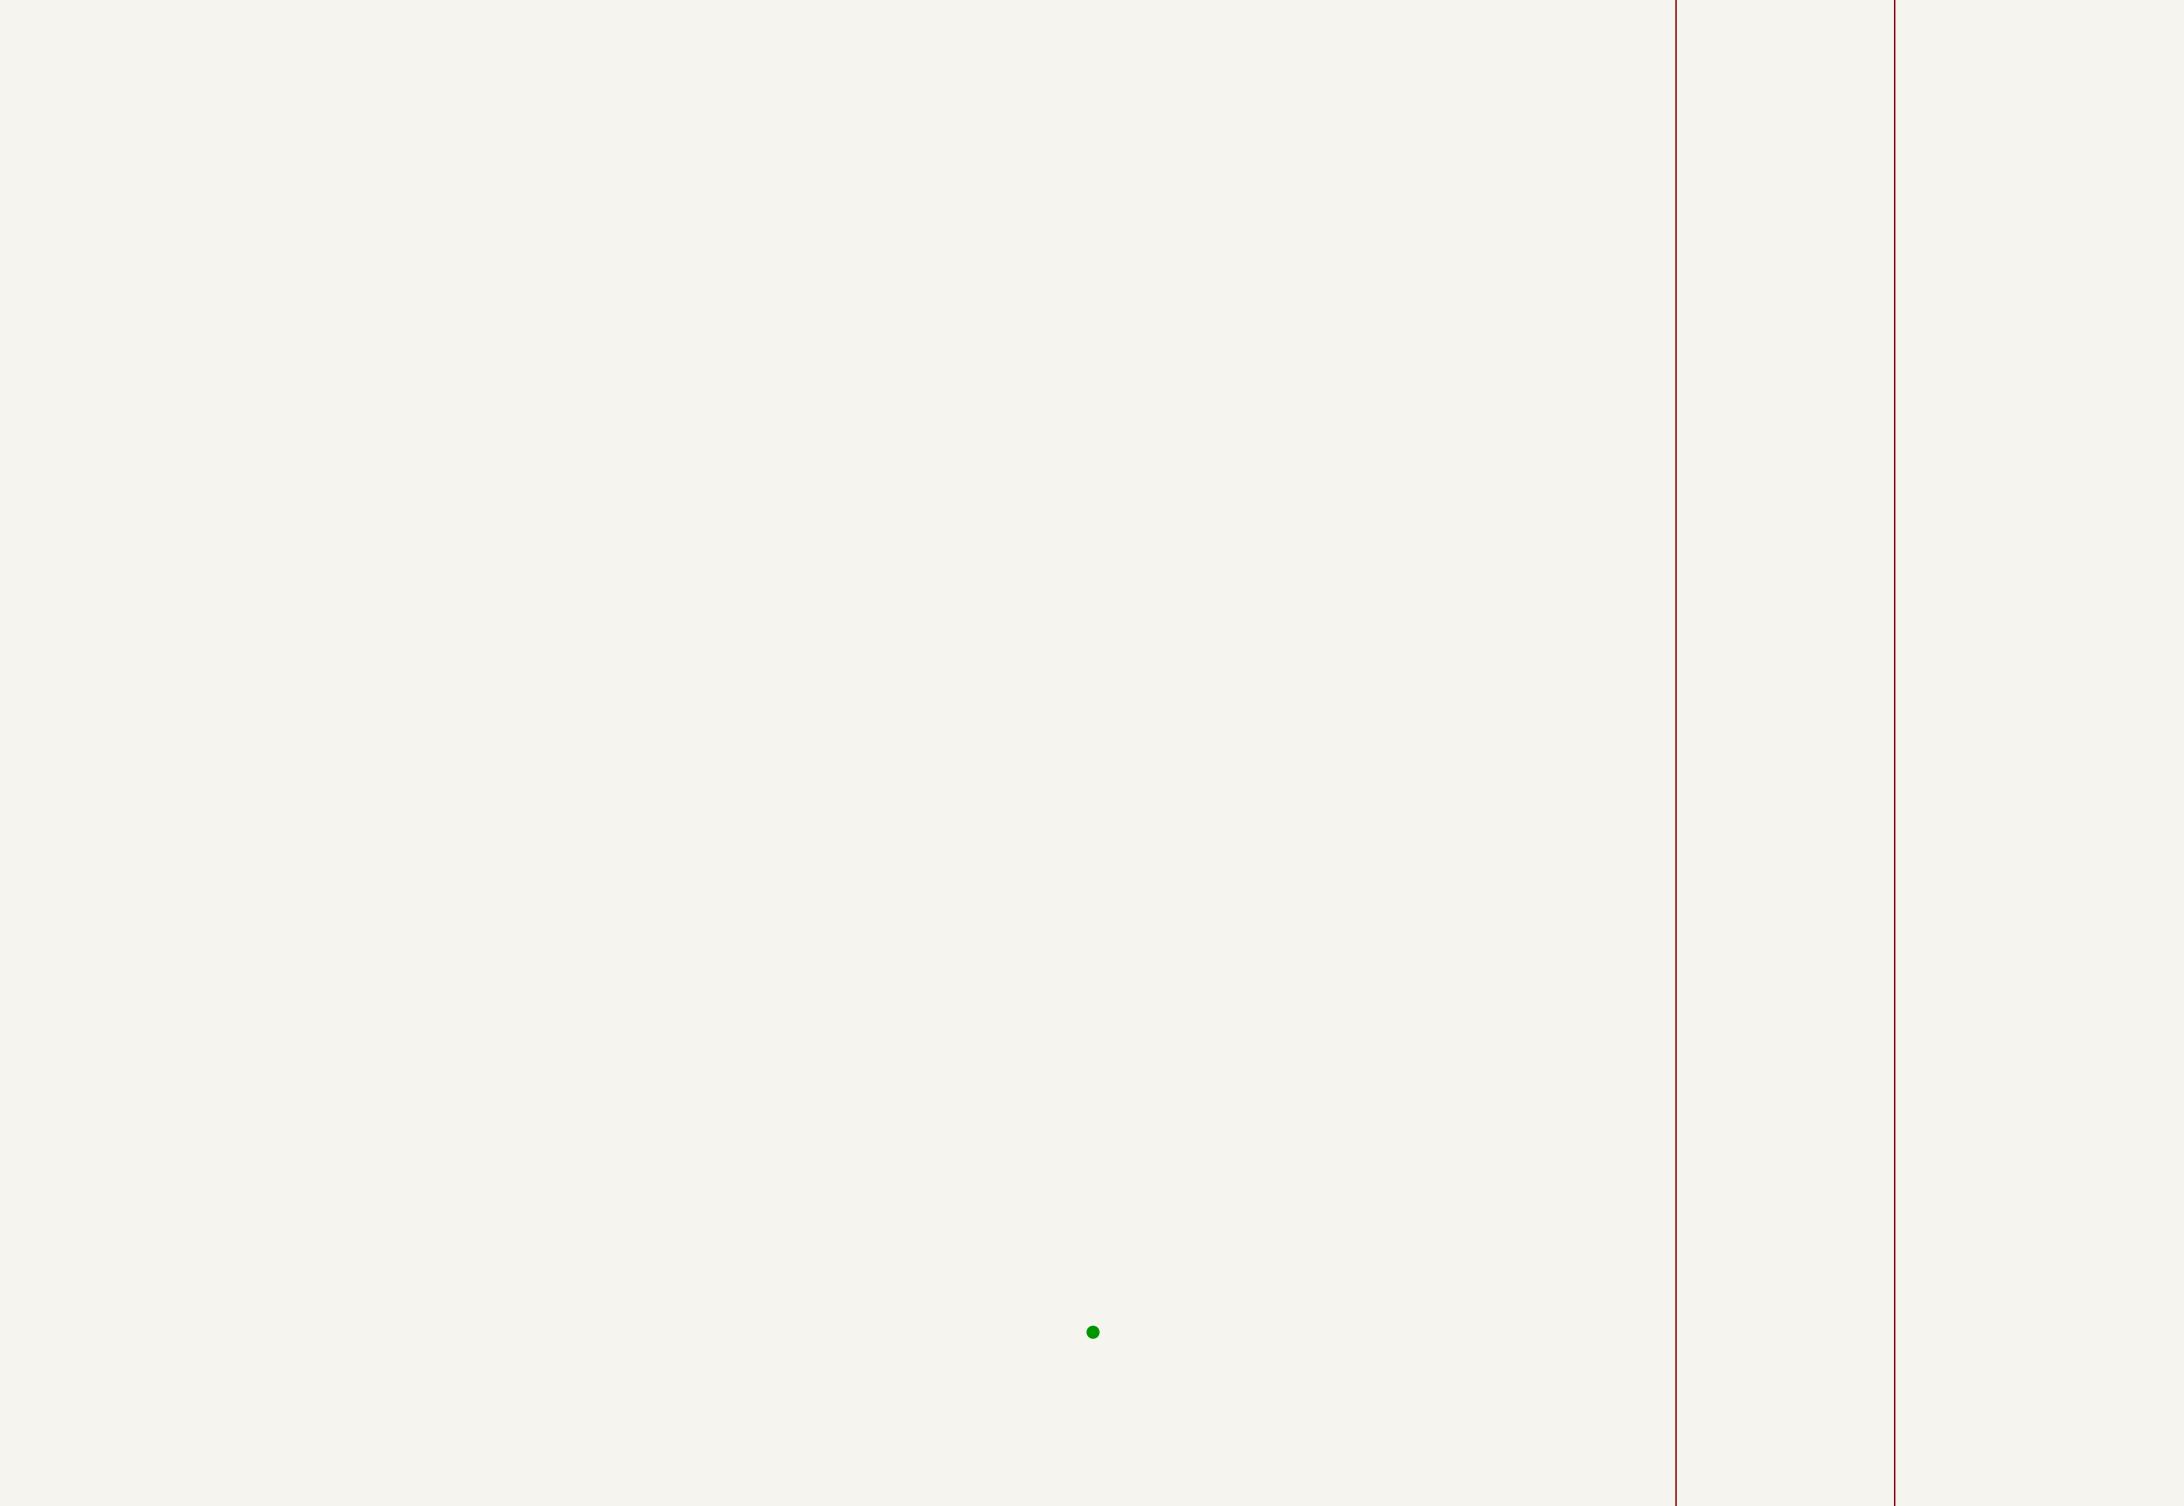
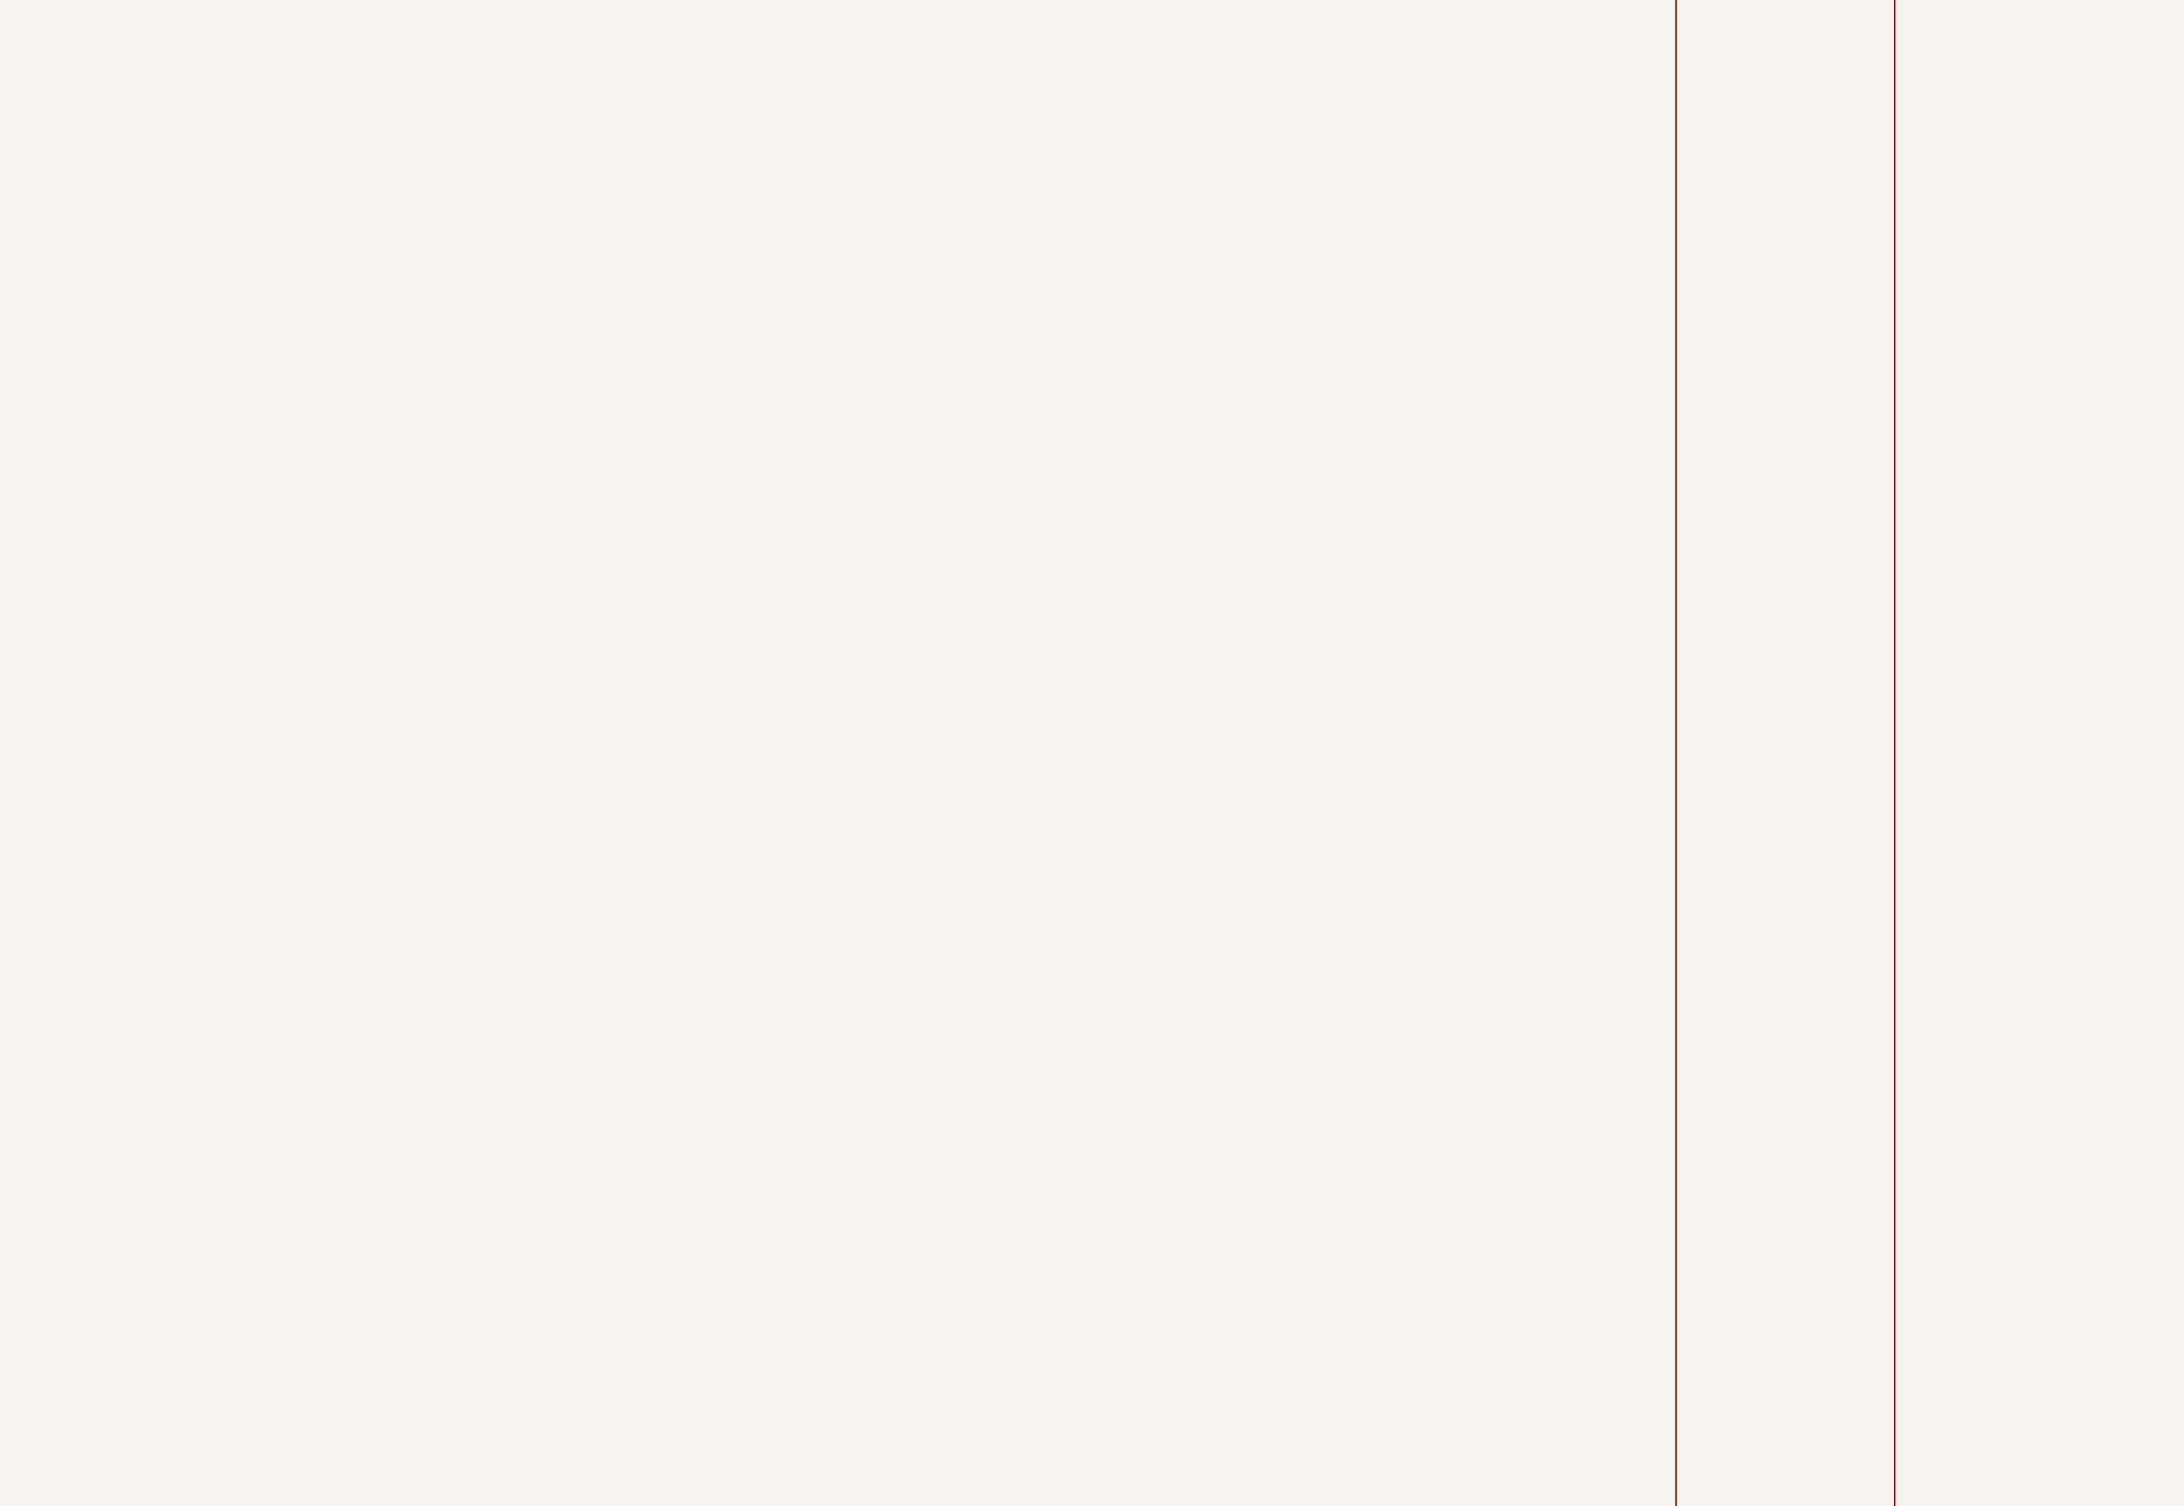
junction: (1093, 1332) -> none

